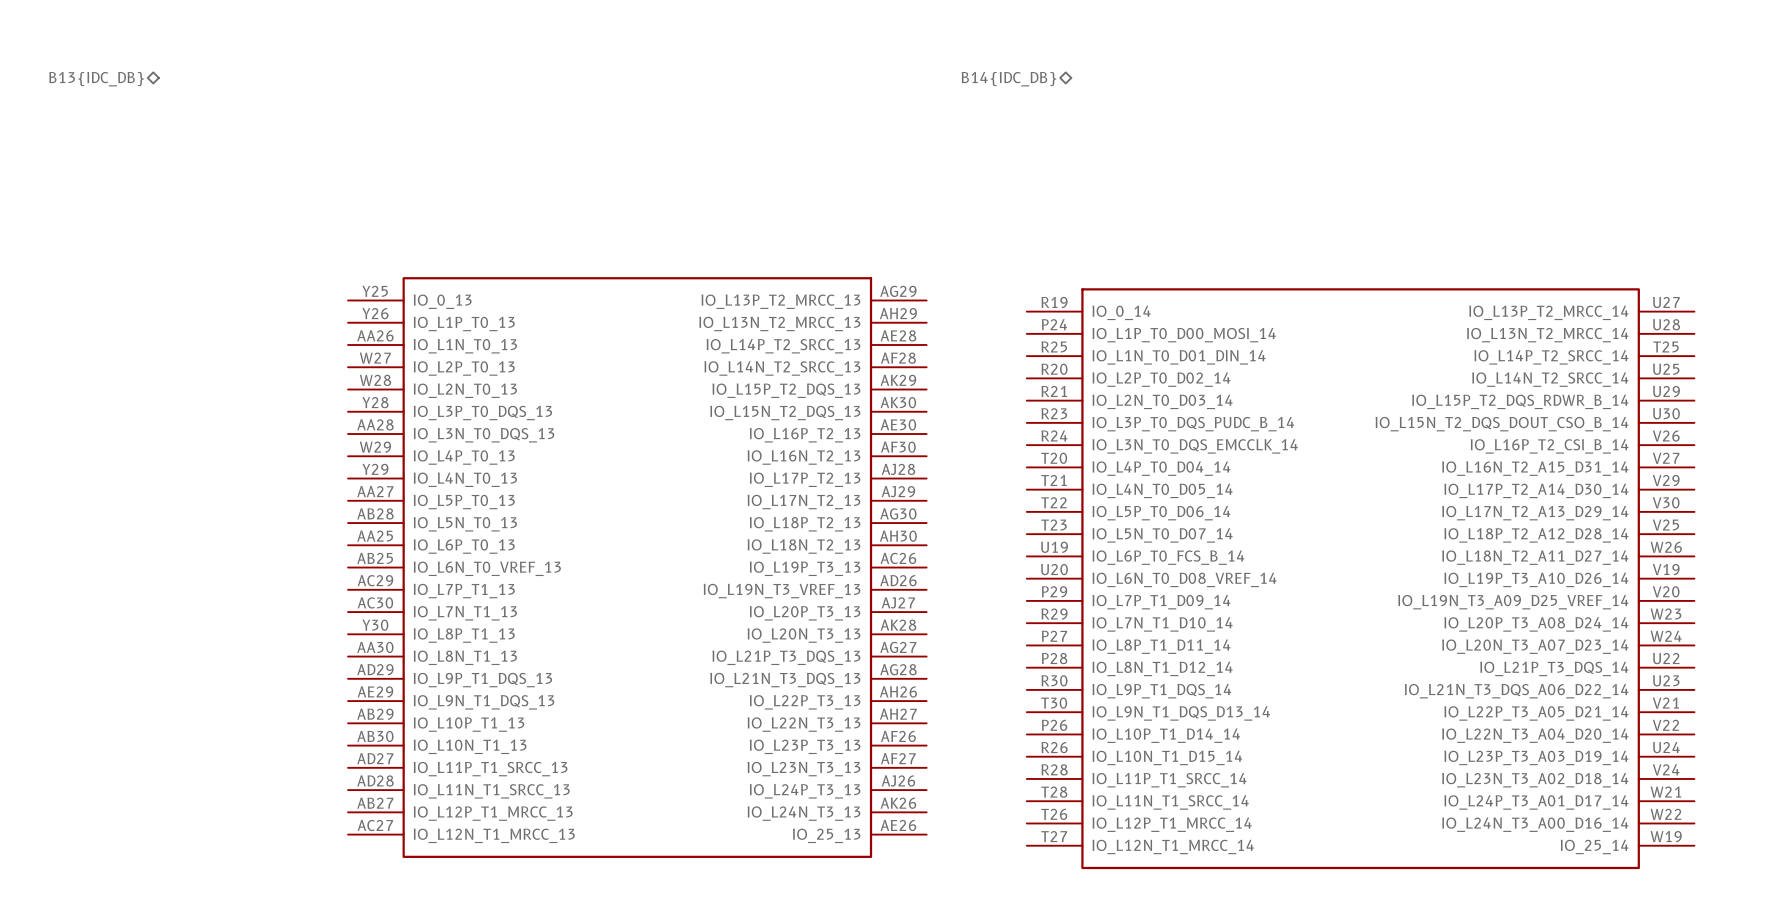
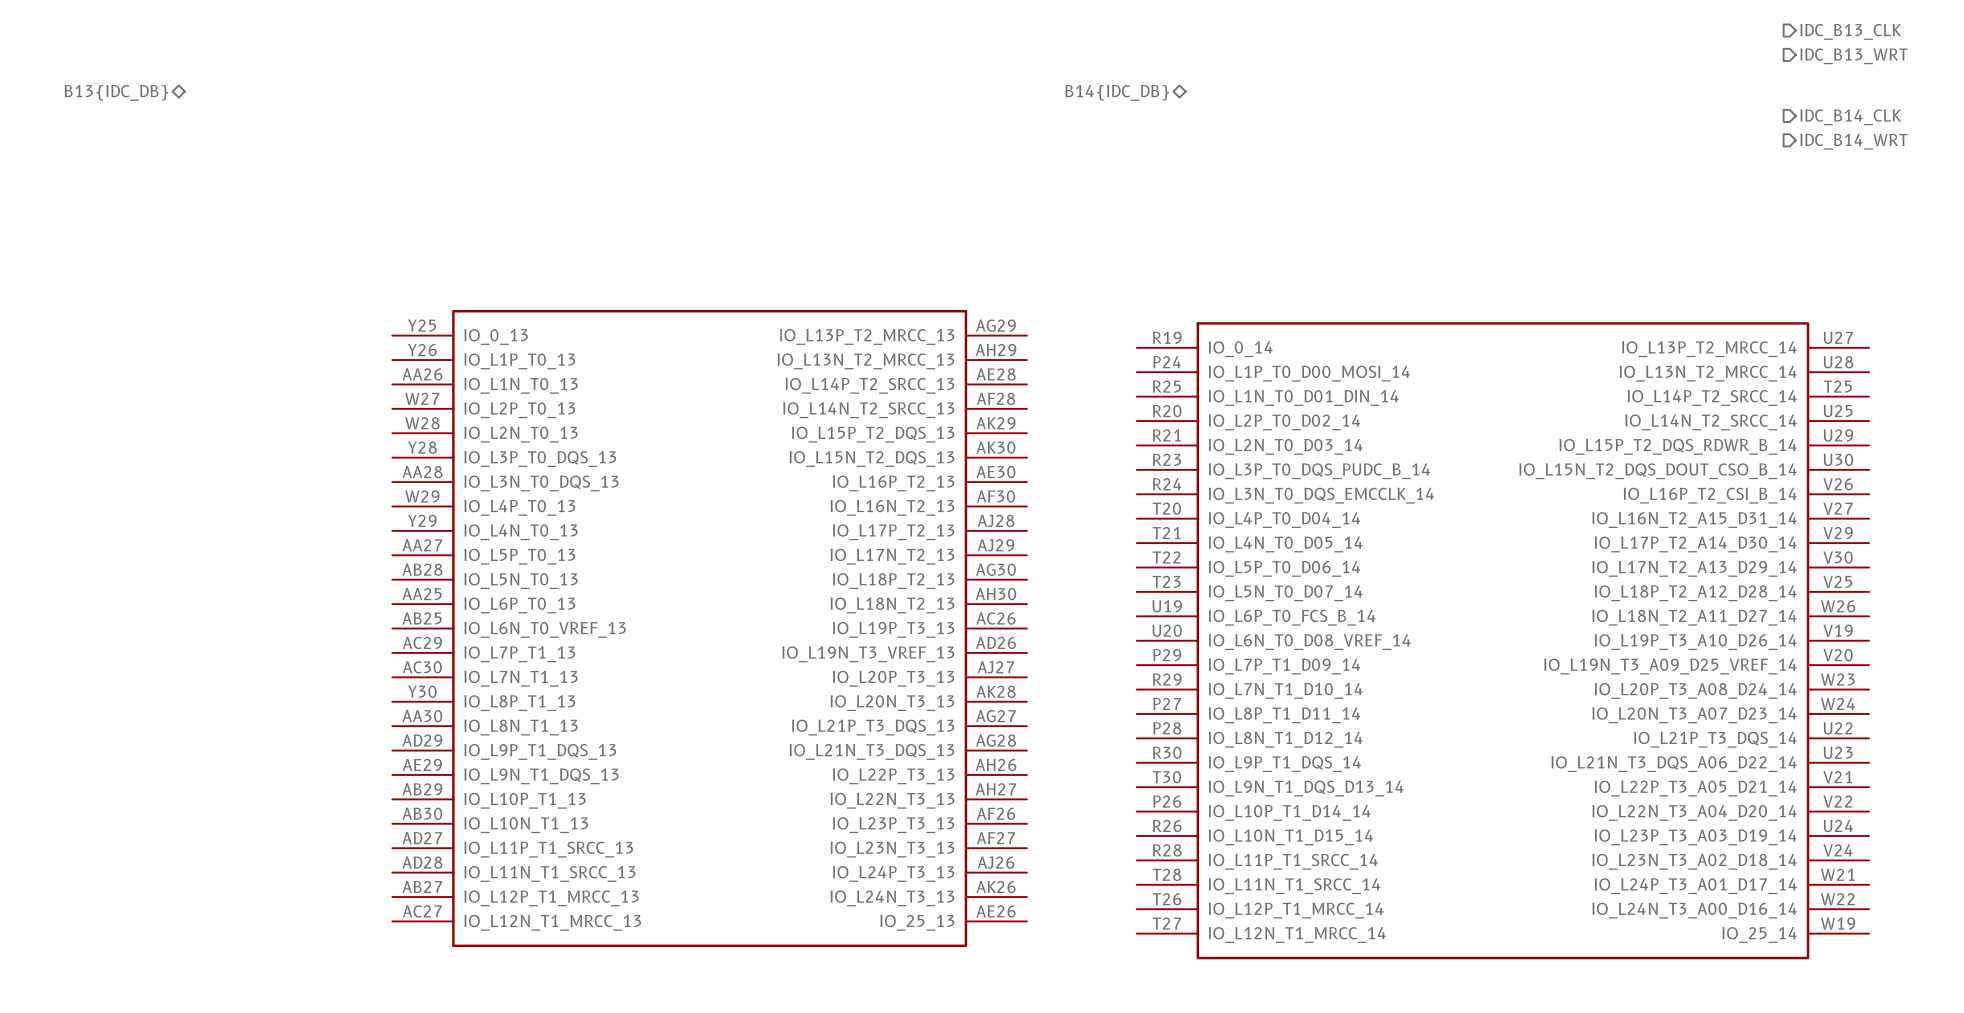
hierarchical label: none -> IDC_B13_CLK (1850, 31)
hierarchical label: none -> IDC_B13_WRT (1854, 56)
hierarchical label: none -> IDC_B14_CLK (1850, 117)
hierarchical label: none -> IDC_B14_WRT (1854, 141)

